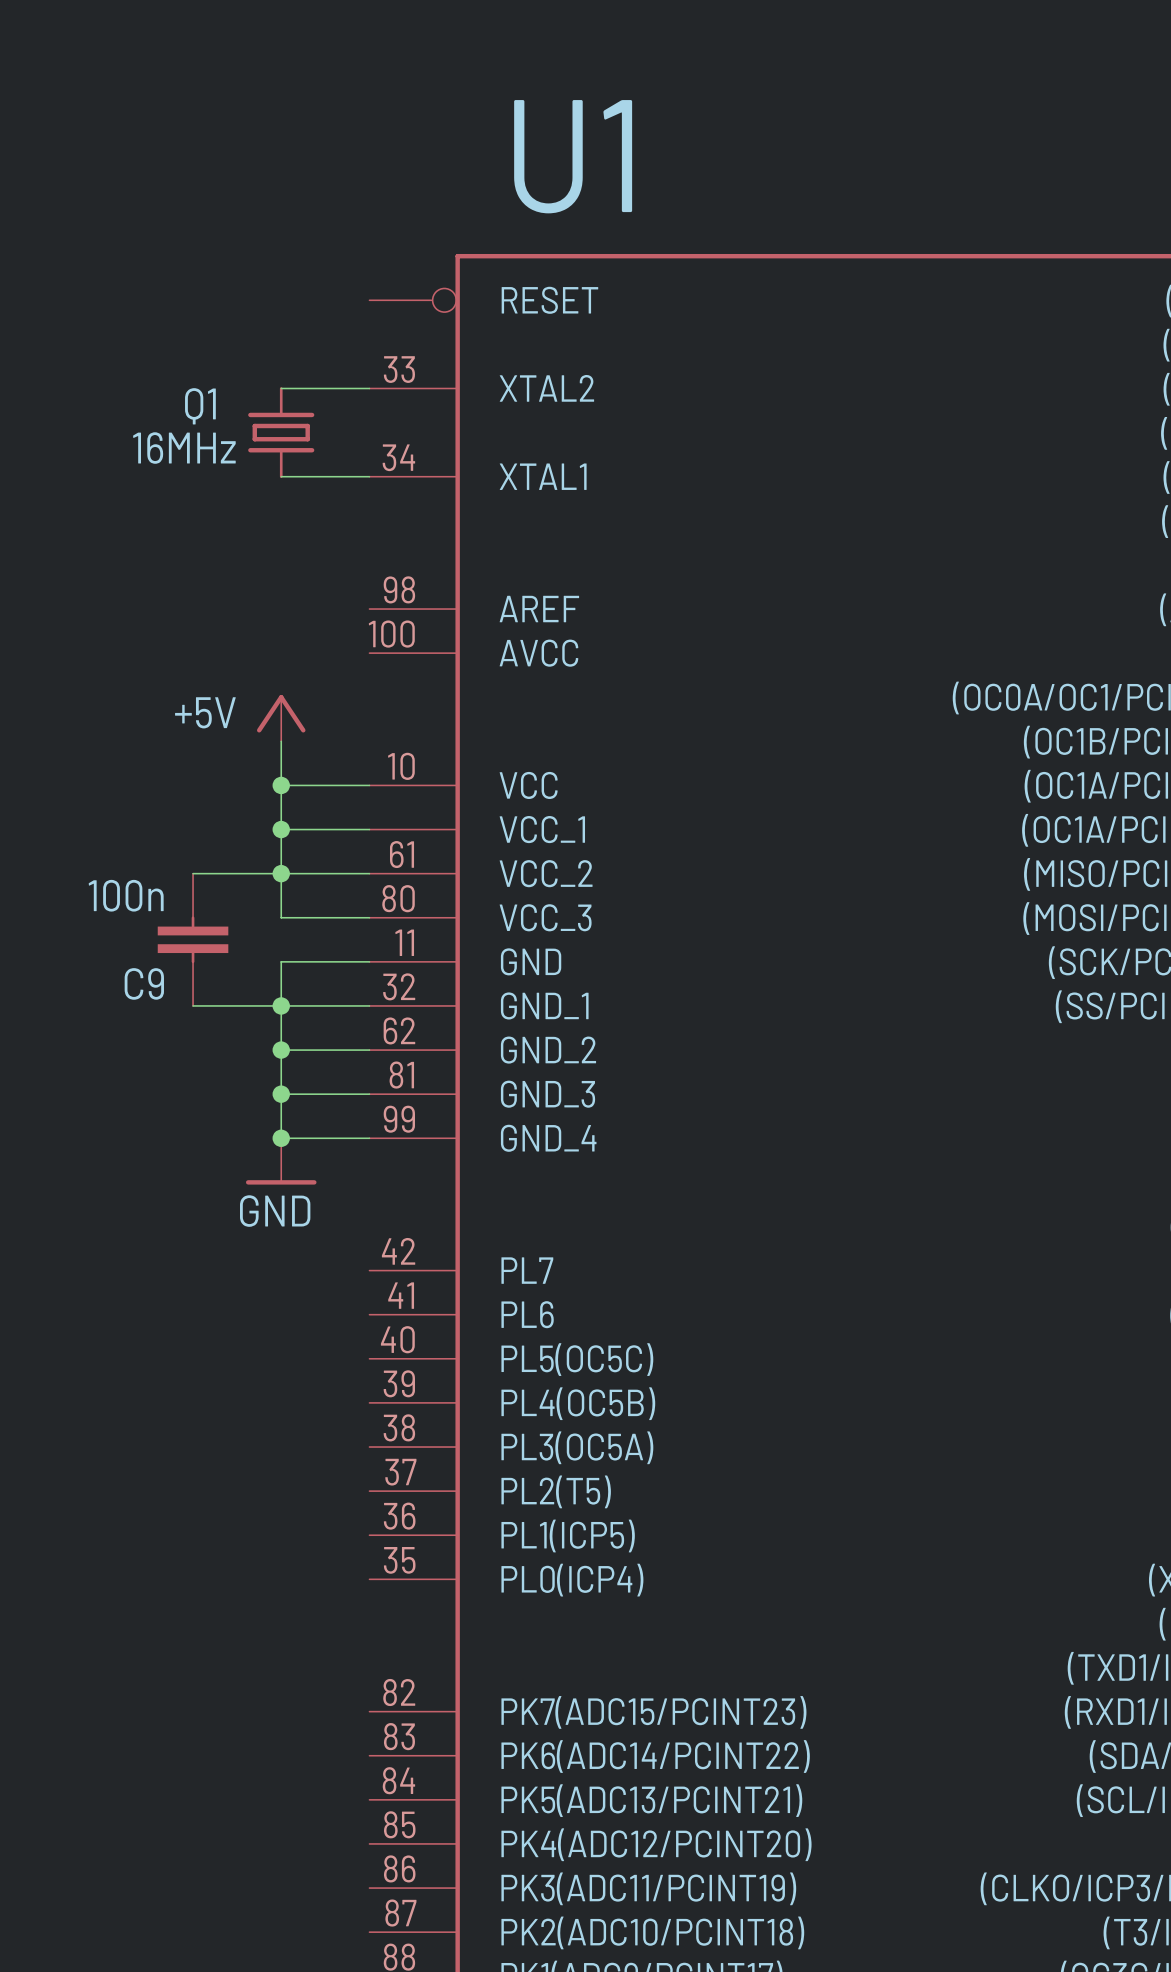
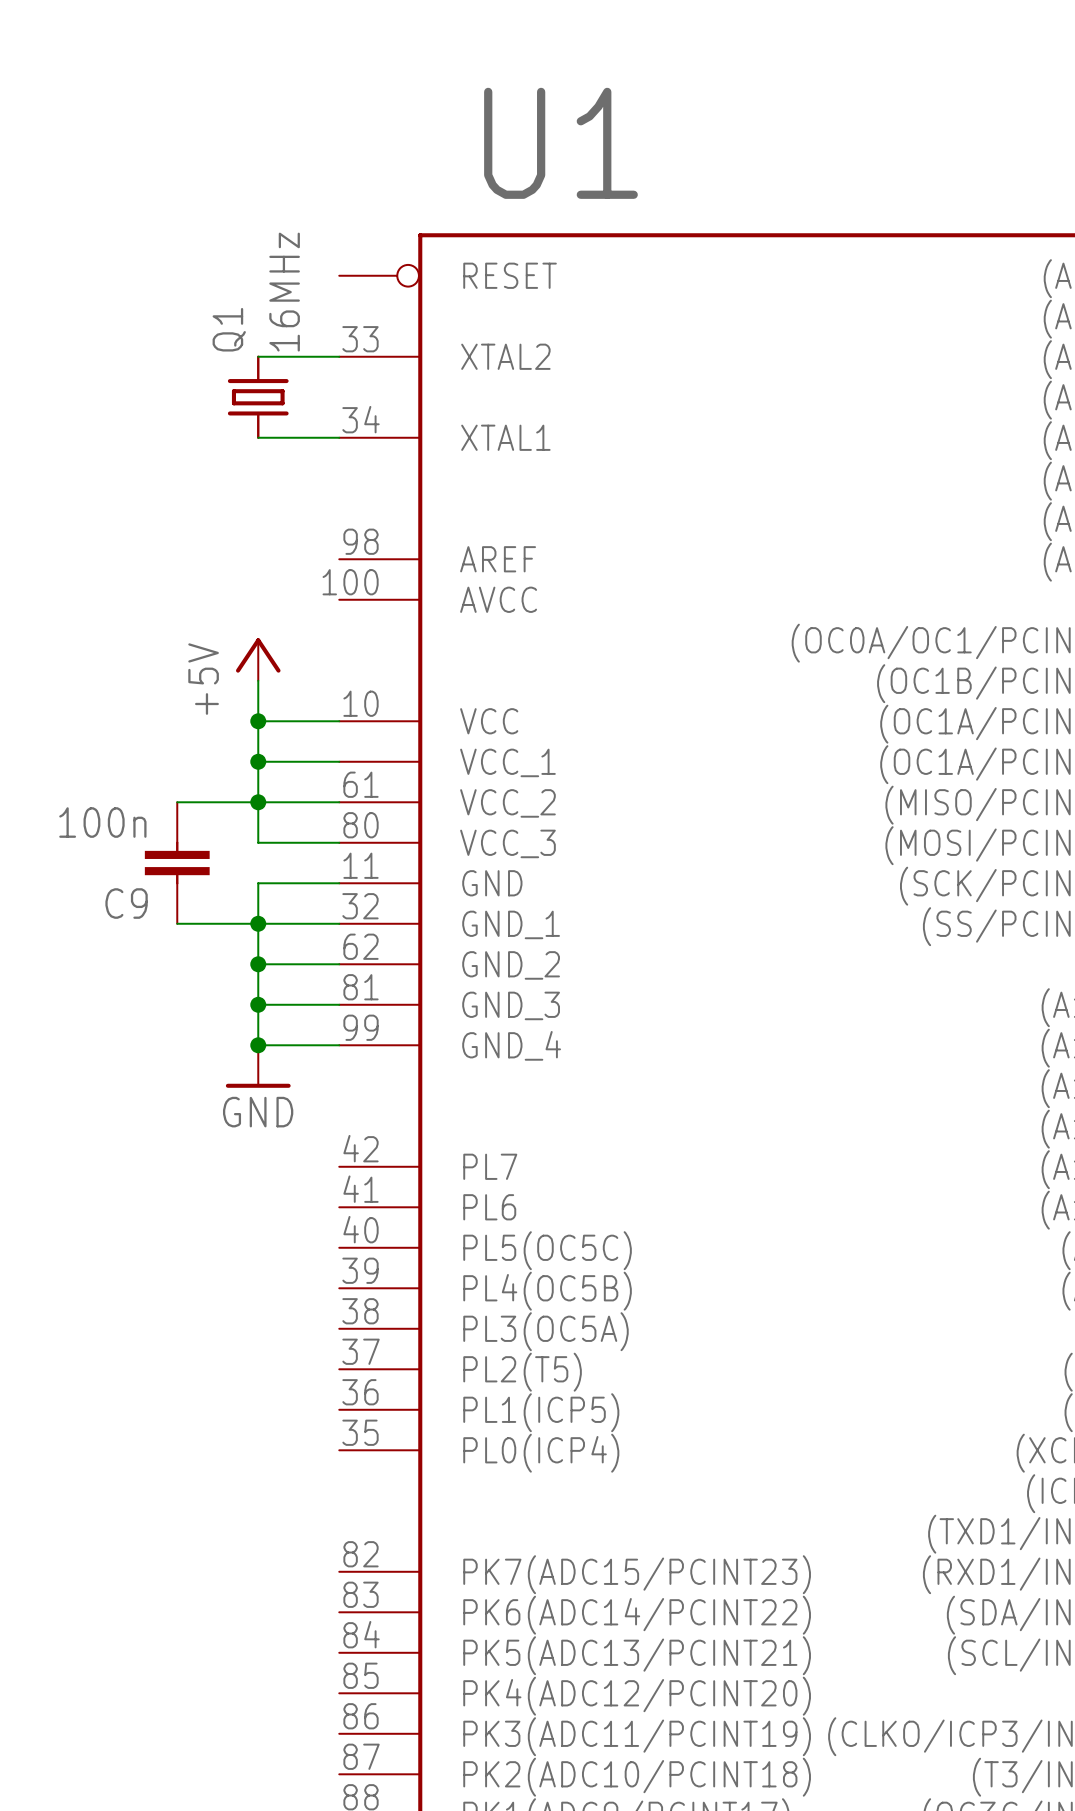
Q1 name rotation: 0° (200, 406) -> 90° counterclockwise (229, 329)
Q1 name position: Q1 (200, 406) -> Q1 (229, 329)
Q1 value rotation: 0° (184, 448) -> 90° counterclockwise (284, 292)
Q1 value position: 16MHz (184, 448) -> 16MHz (284, 292)
power symbol text rotation: 0° (205, 712) -> 90° counterclockwise (203, 679)

